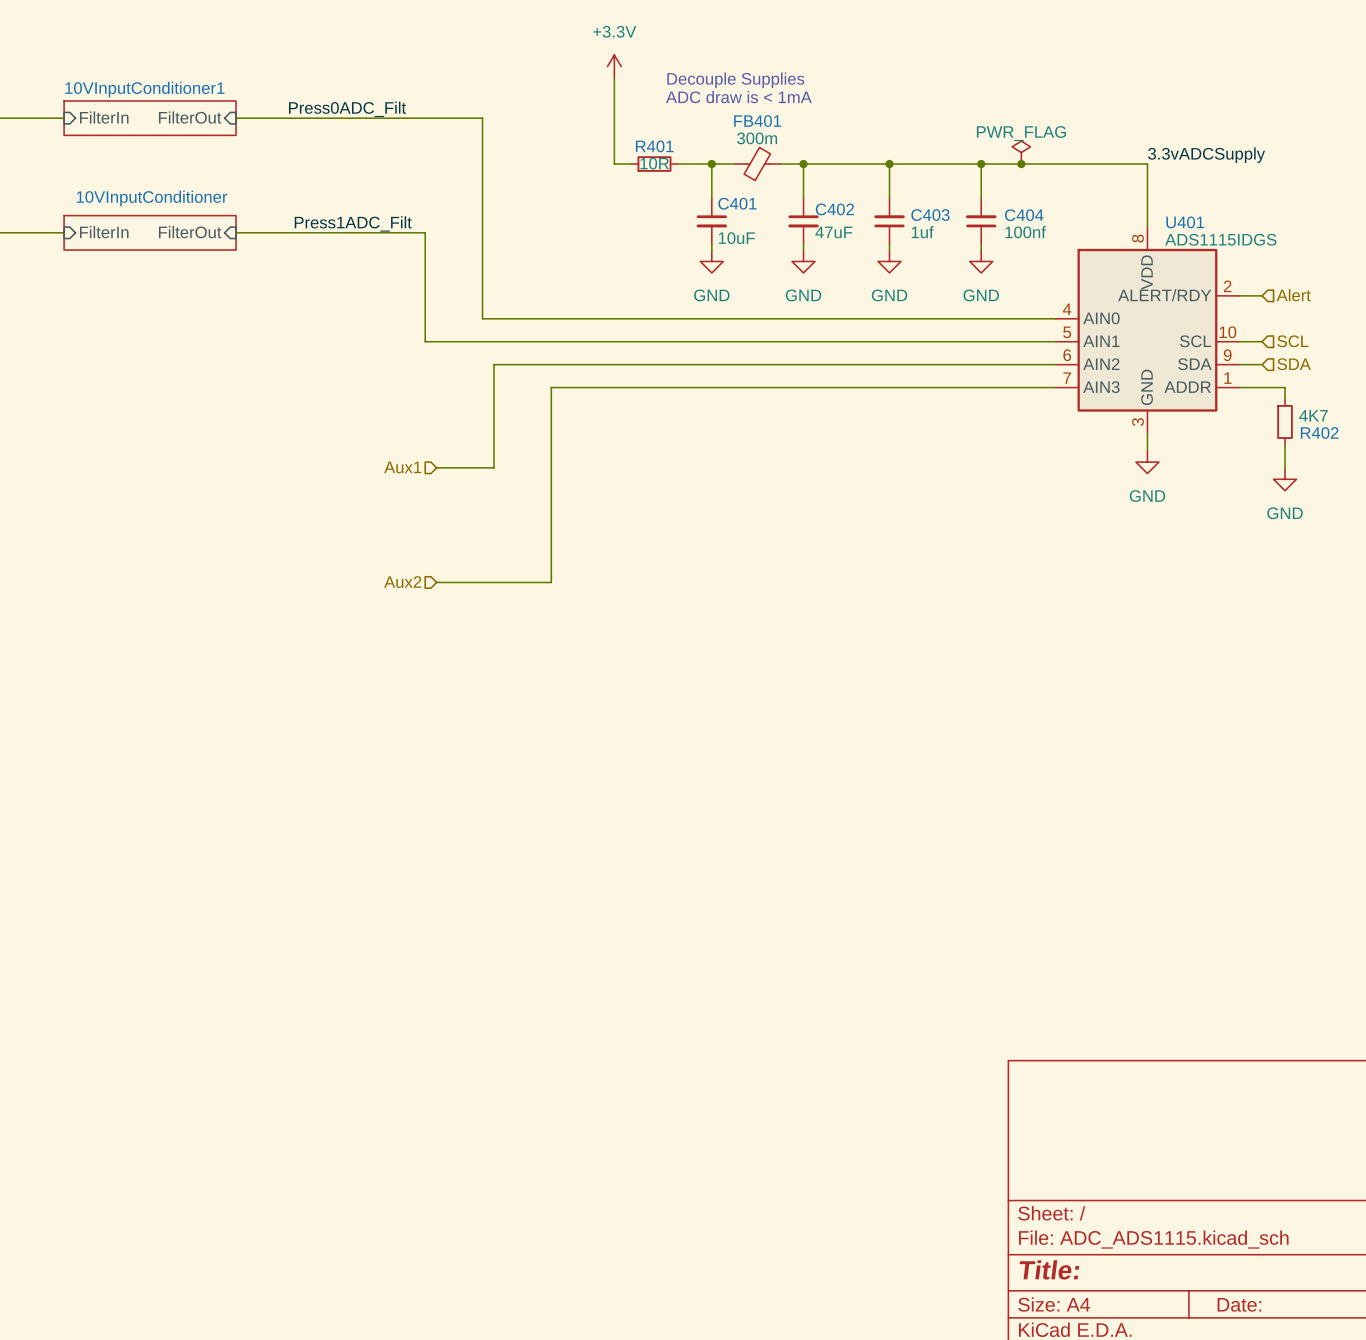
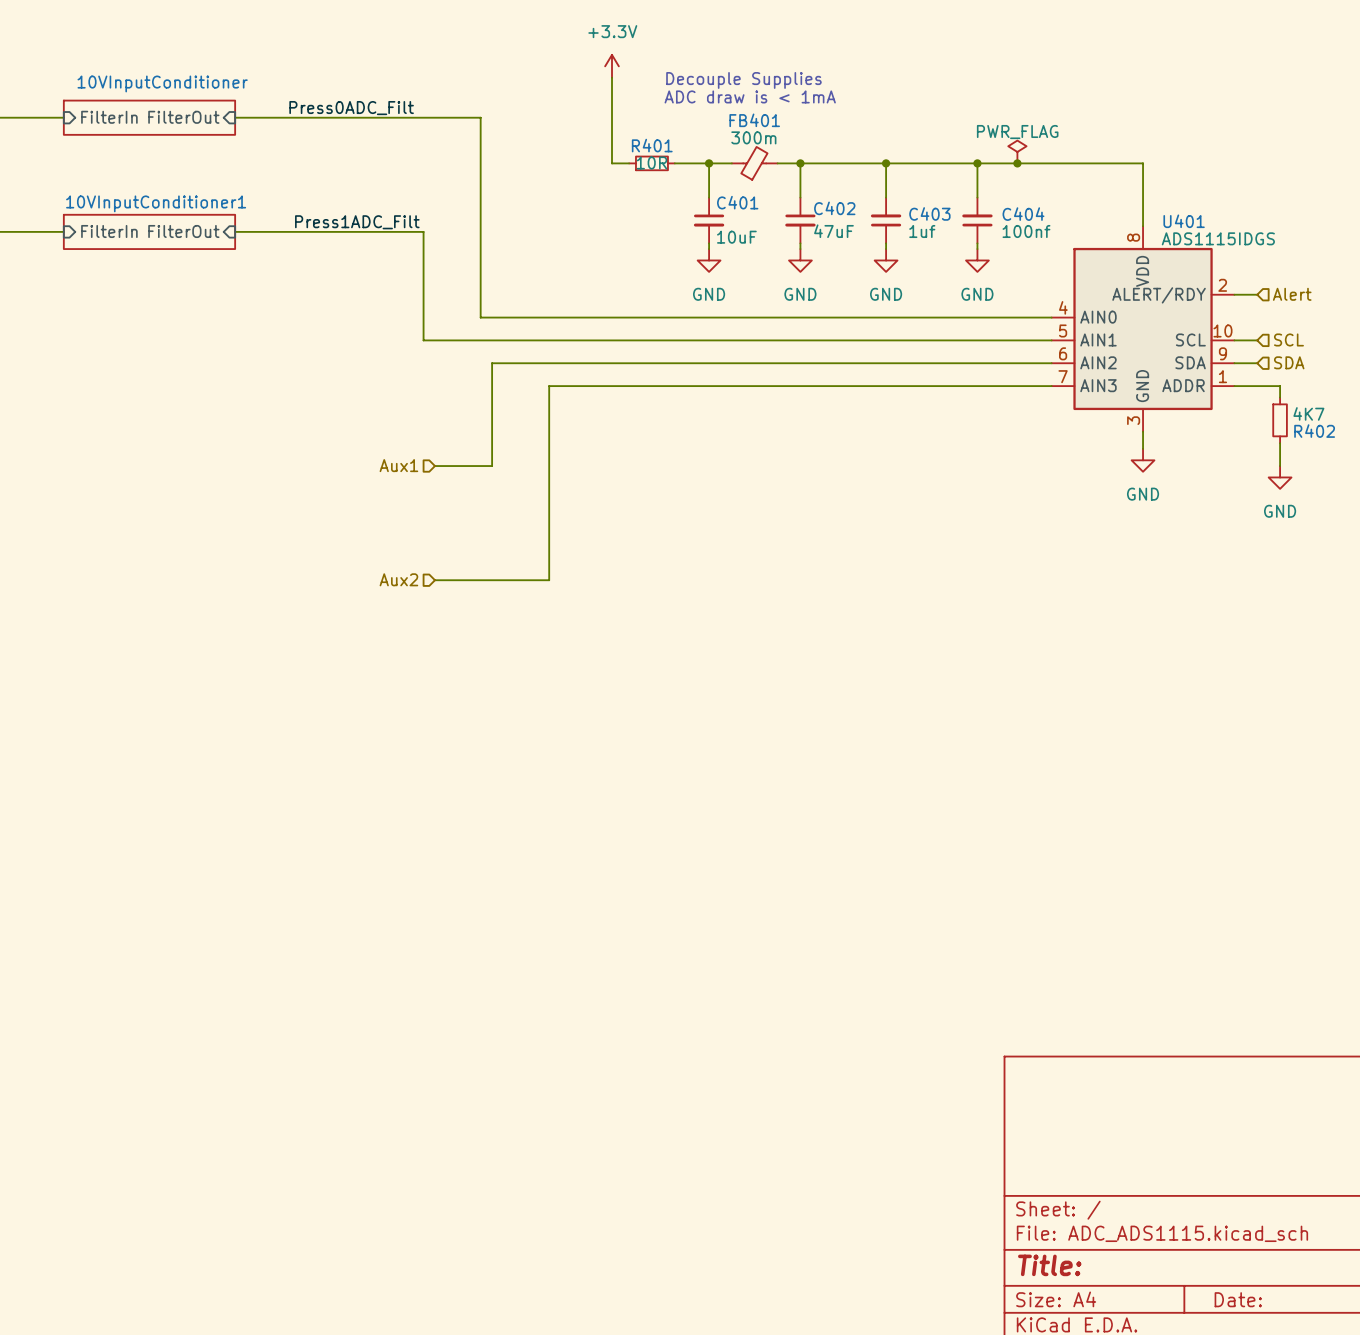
sheet 10VInputConditioner1 name: 10VInputConditioner1 (144, 89) -> 10VInputConditioner (162, 83)
label: 3.3vADCSupply (1206, 155) -> none
sheet 10VInputConditioner name: 10VInputConditioner (152, 198) -> 10VInputConditioner1 (156, 203)

